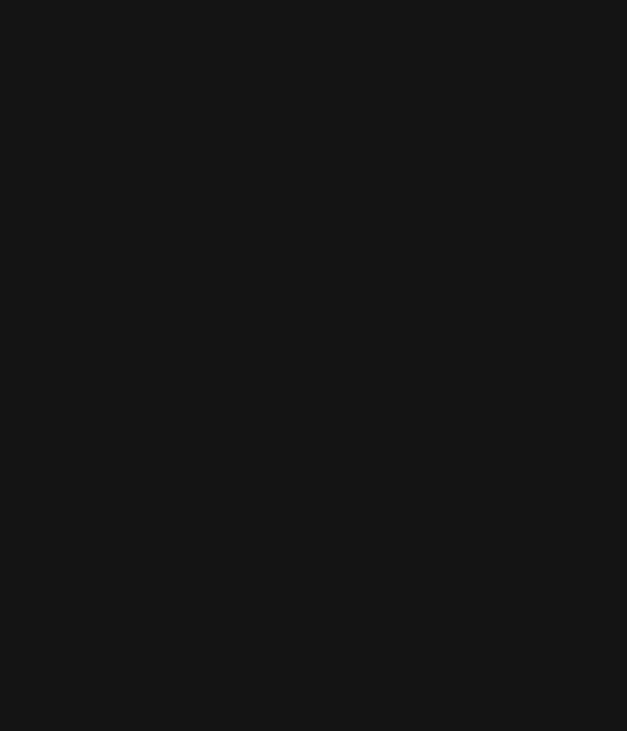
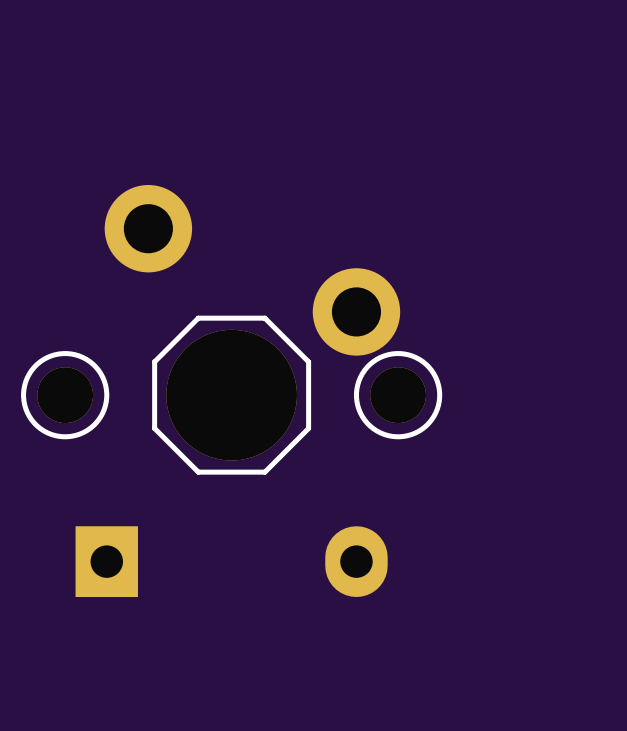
part: none -> (231, 391)

